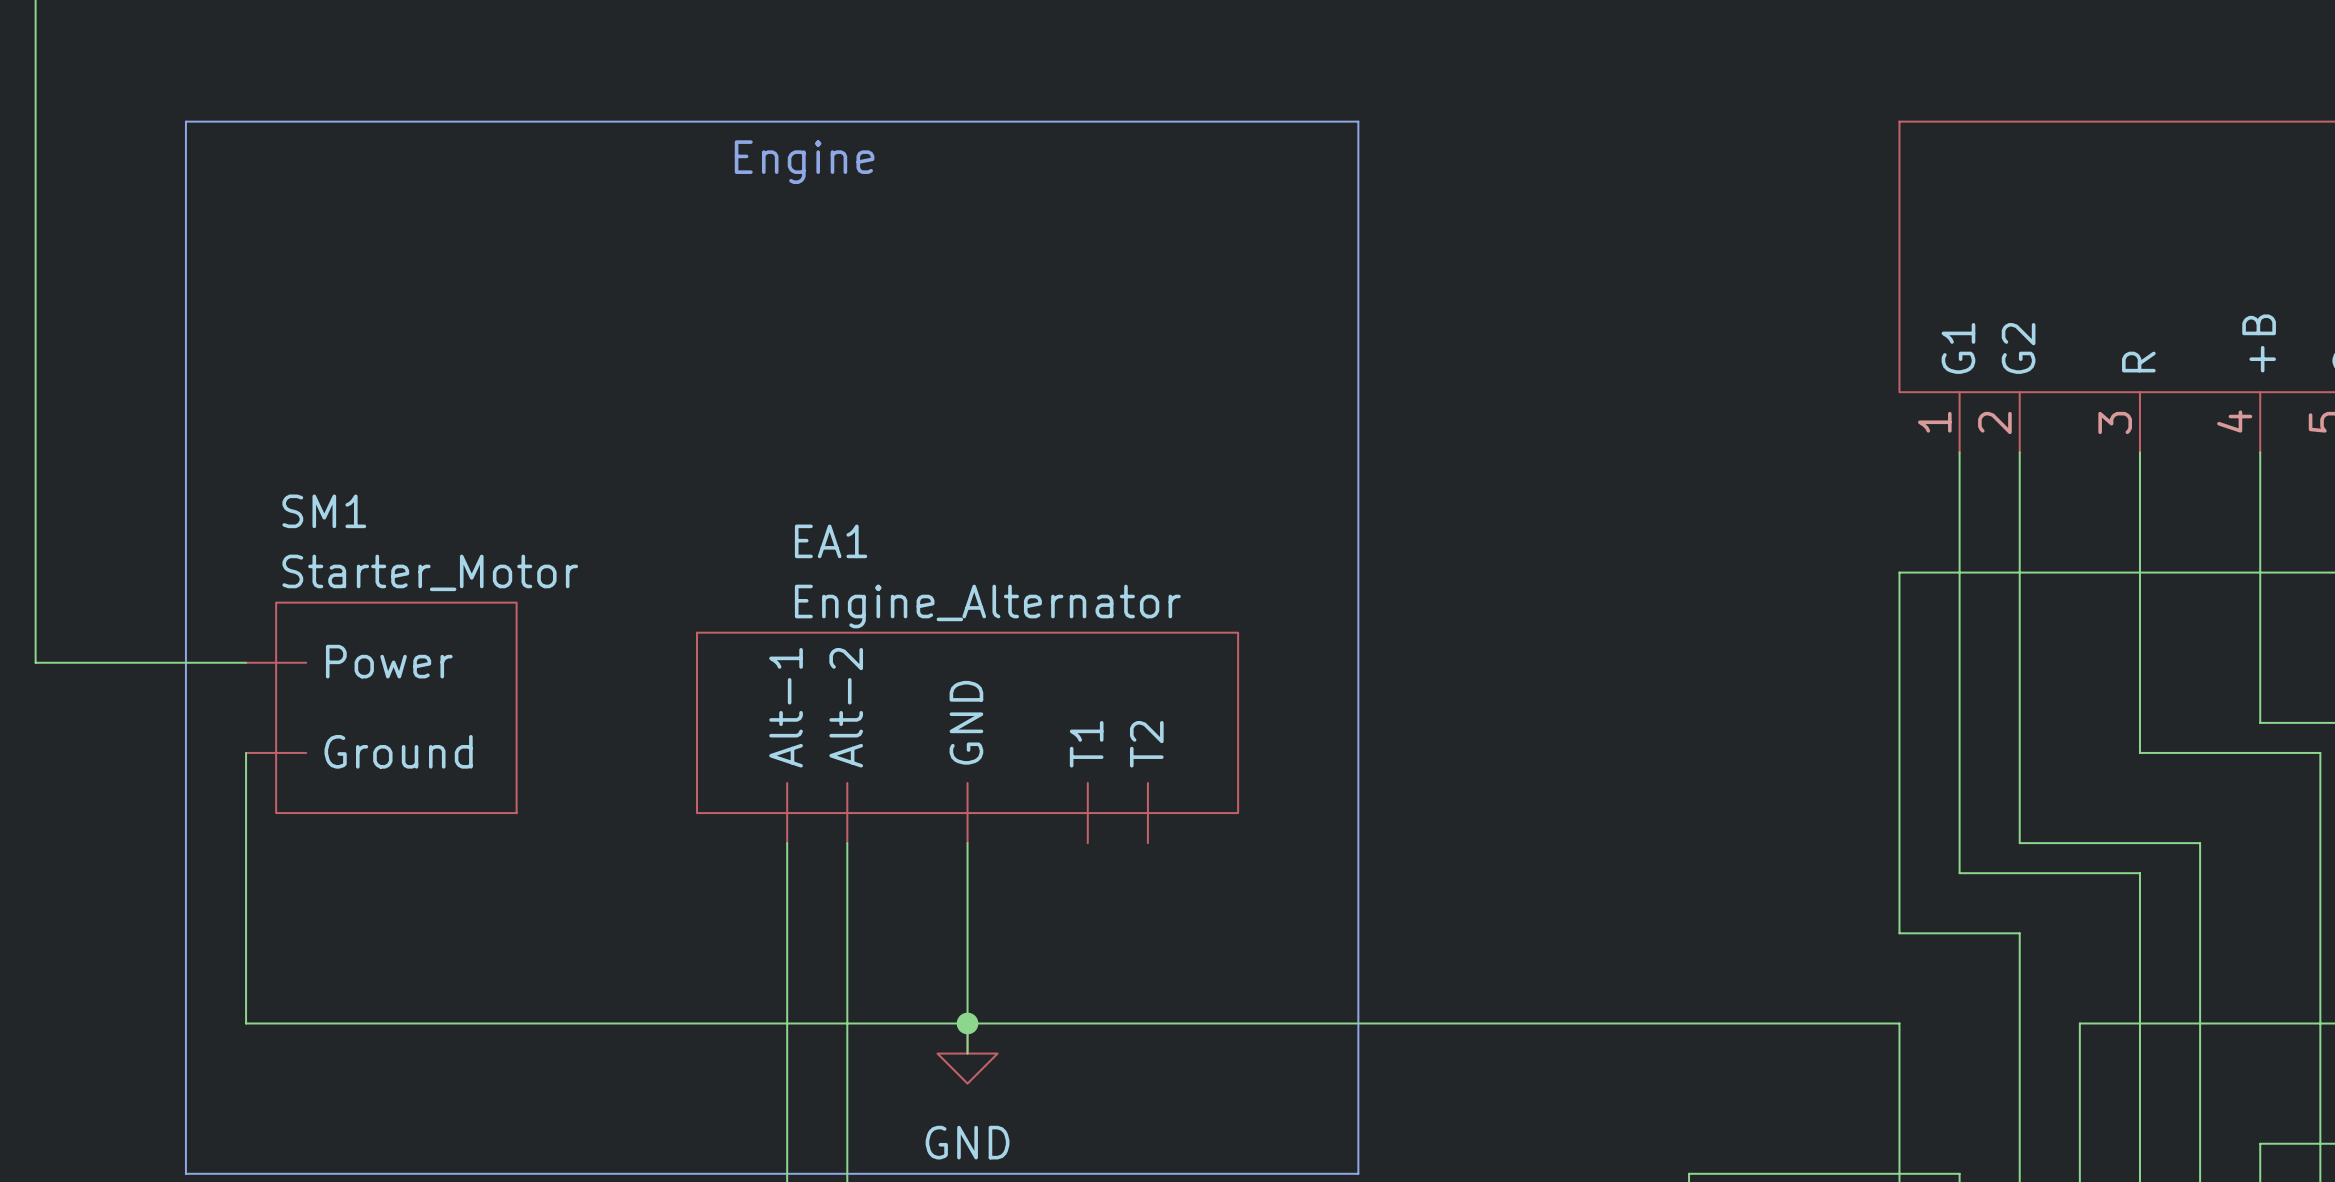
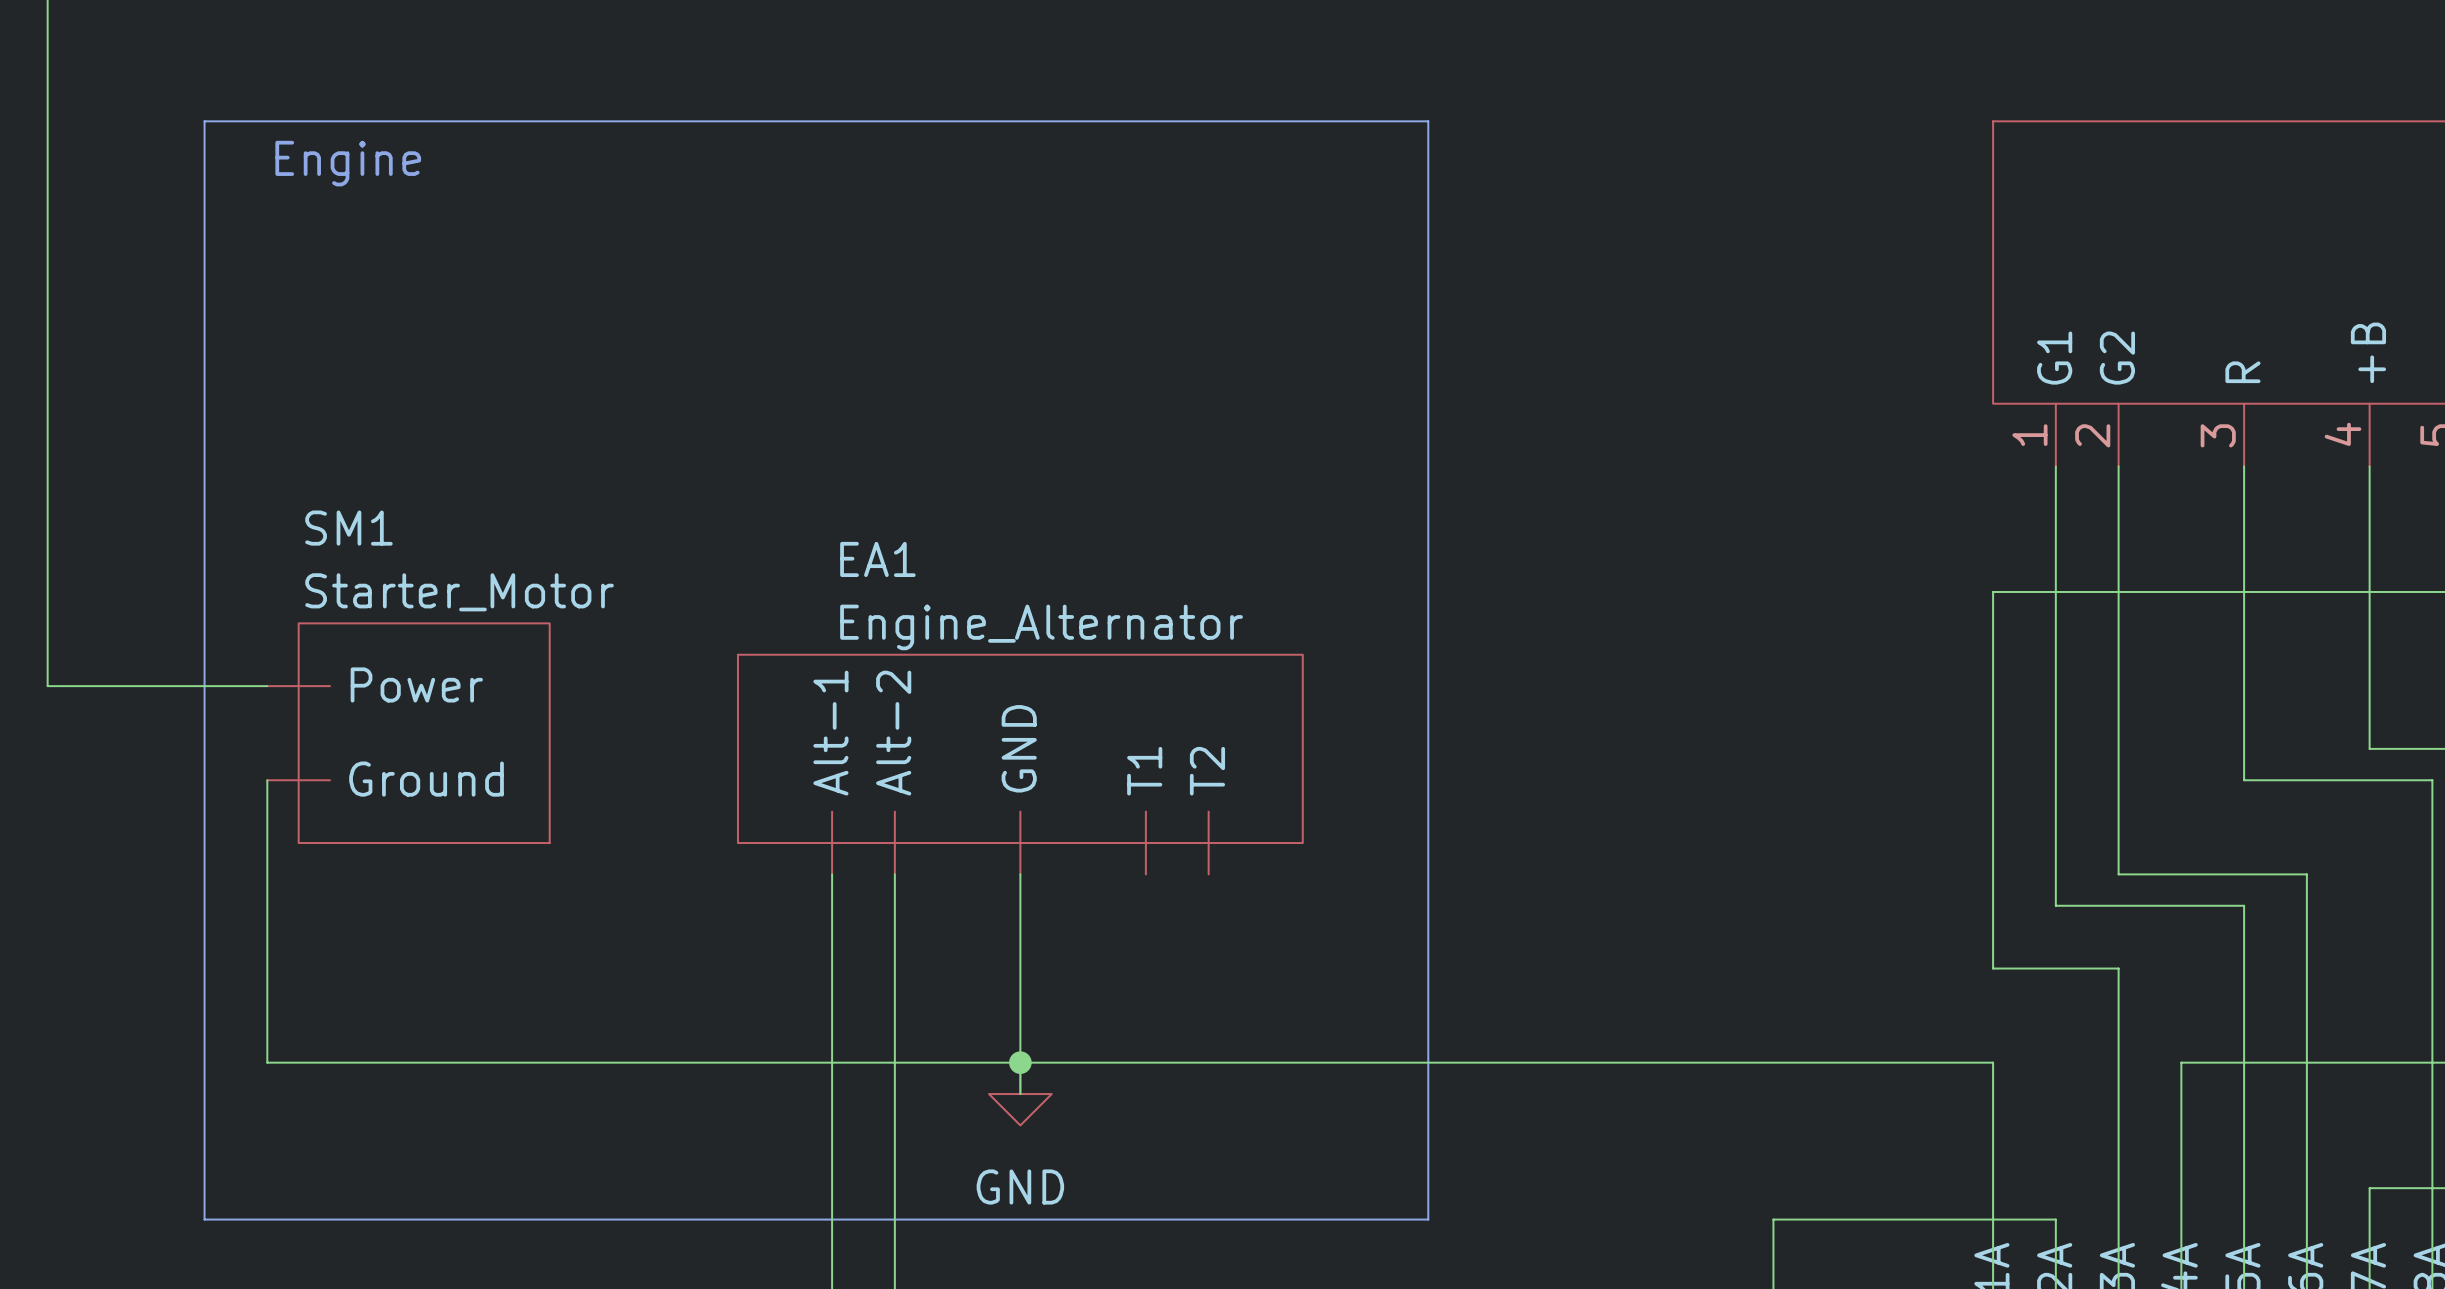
text position: Engine (804, 162) -> Engine (348, 163)

